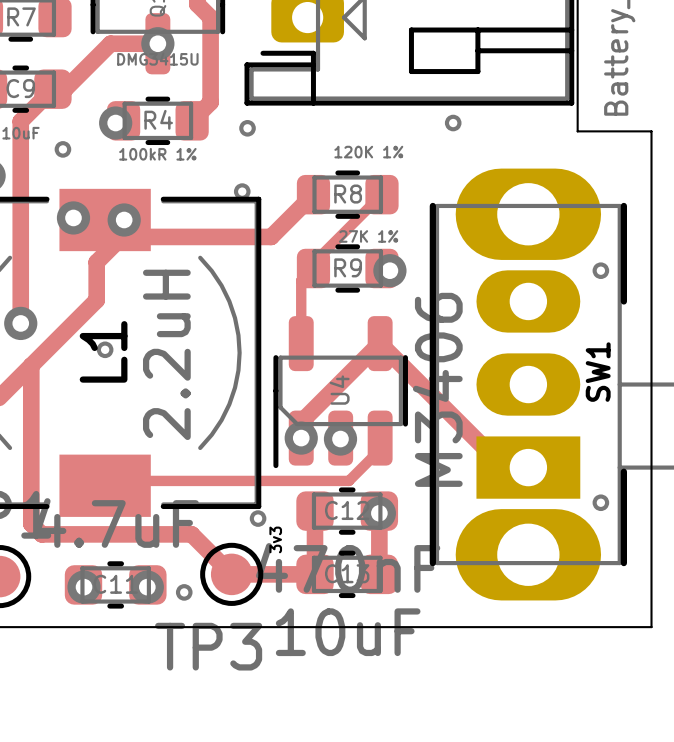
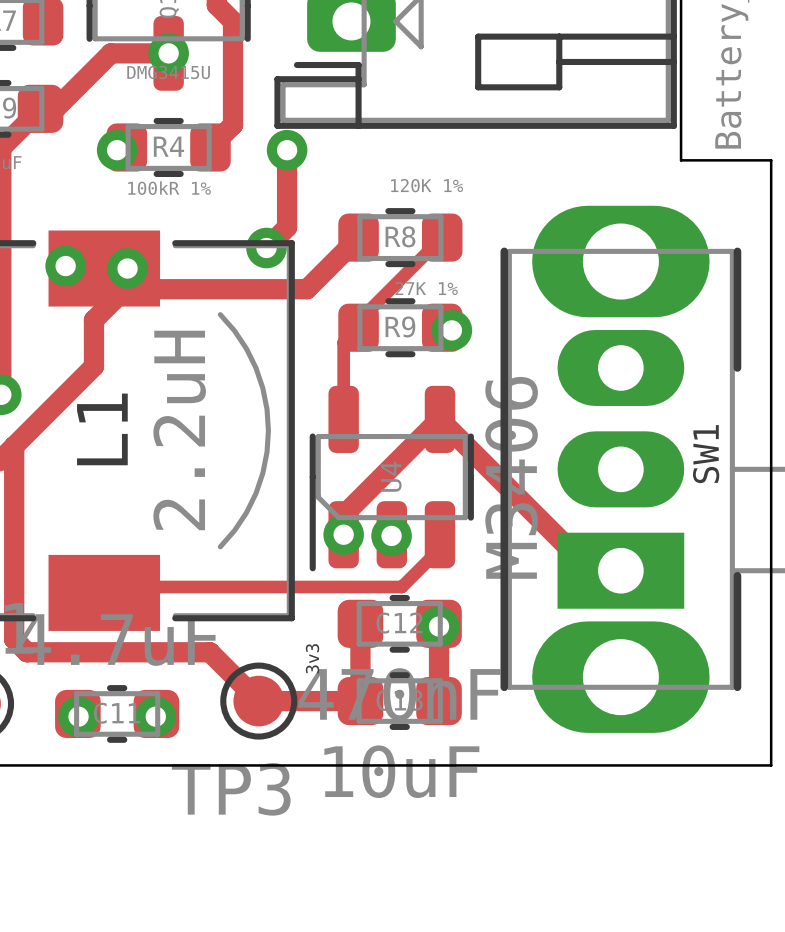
via size: [239, 119, 256, 137] -> [266, 129, 308, 171]
track: none -> (287, 150) (287, 227) (266, 248)
via: (453, 123) -> none
via: (62, 149) -> none
via size: [233, 183, 251, 200] -> [246, 227, 287, 269]
via: (600, 270) -> none
via: (105, 349) -> none
via: (600, 502) -> none
via: (258, 518) -> none
via: (184, 592) -> none

